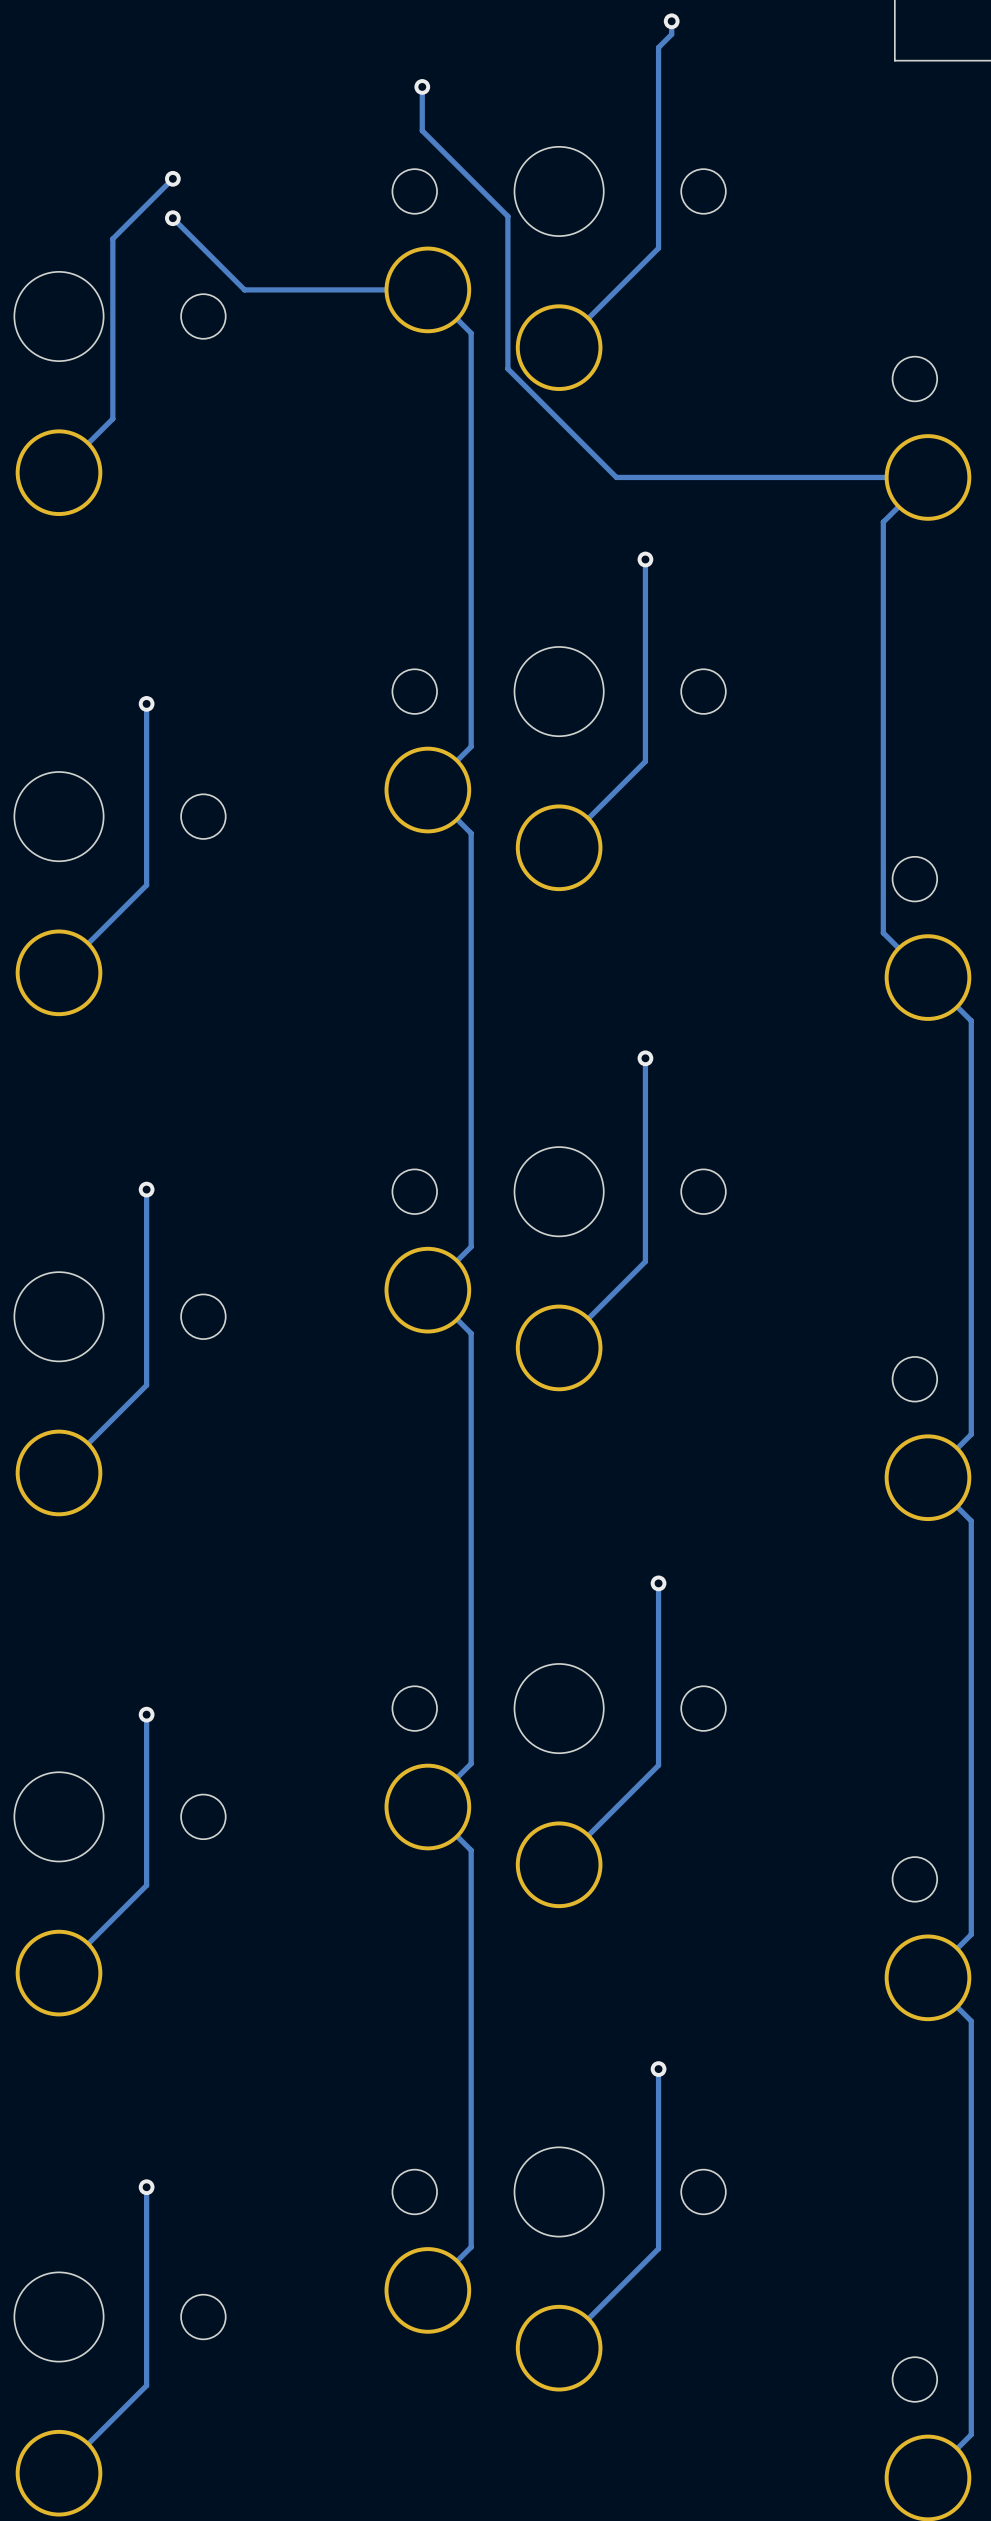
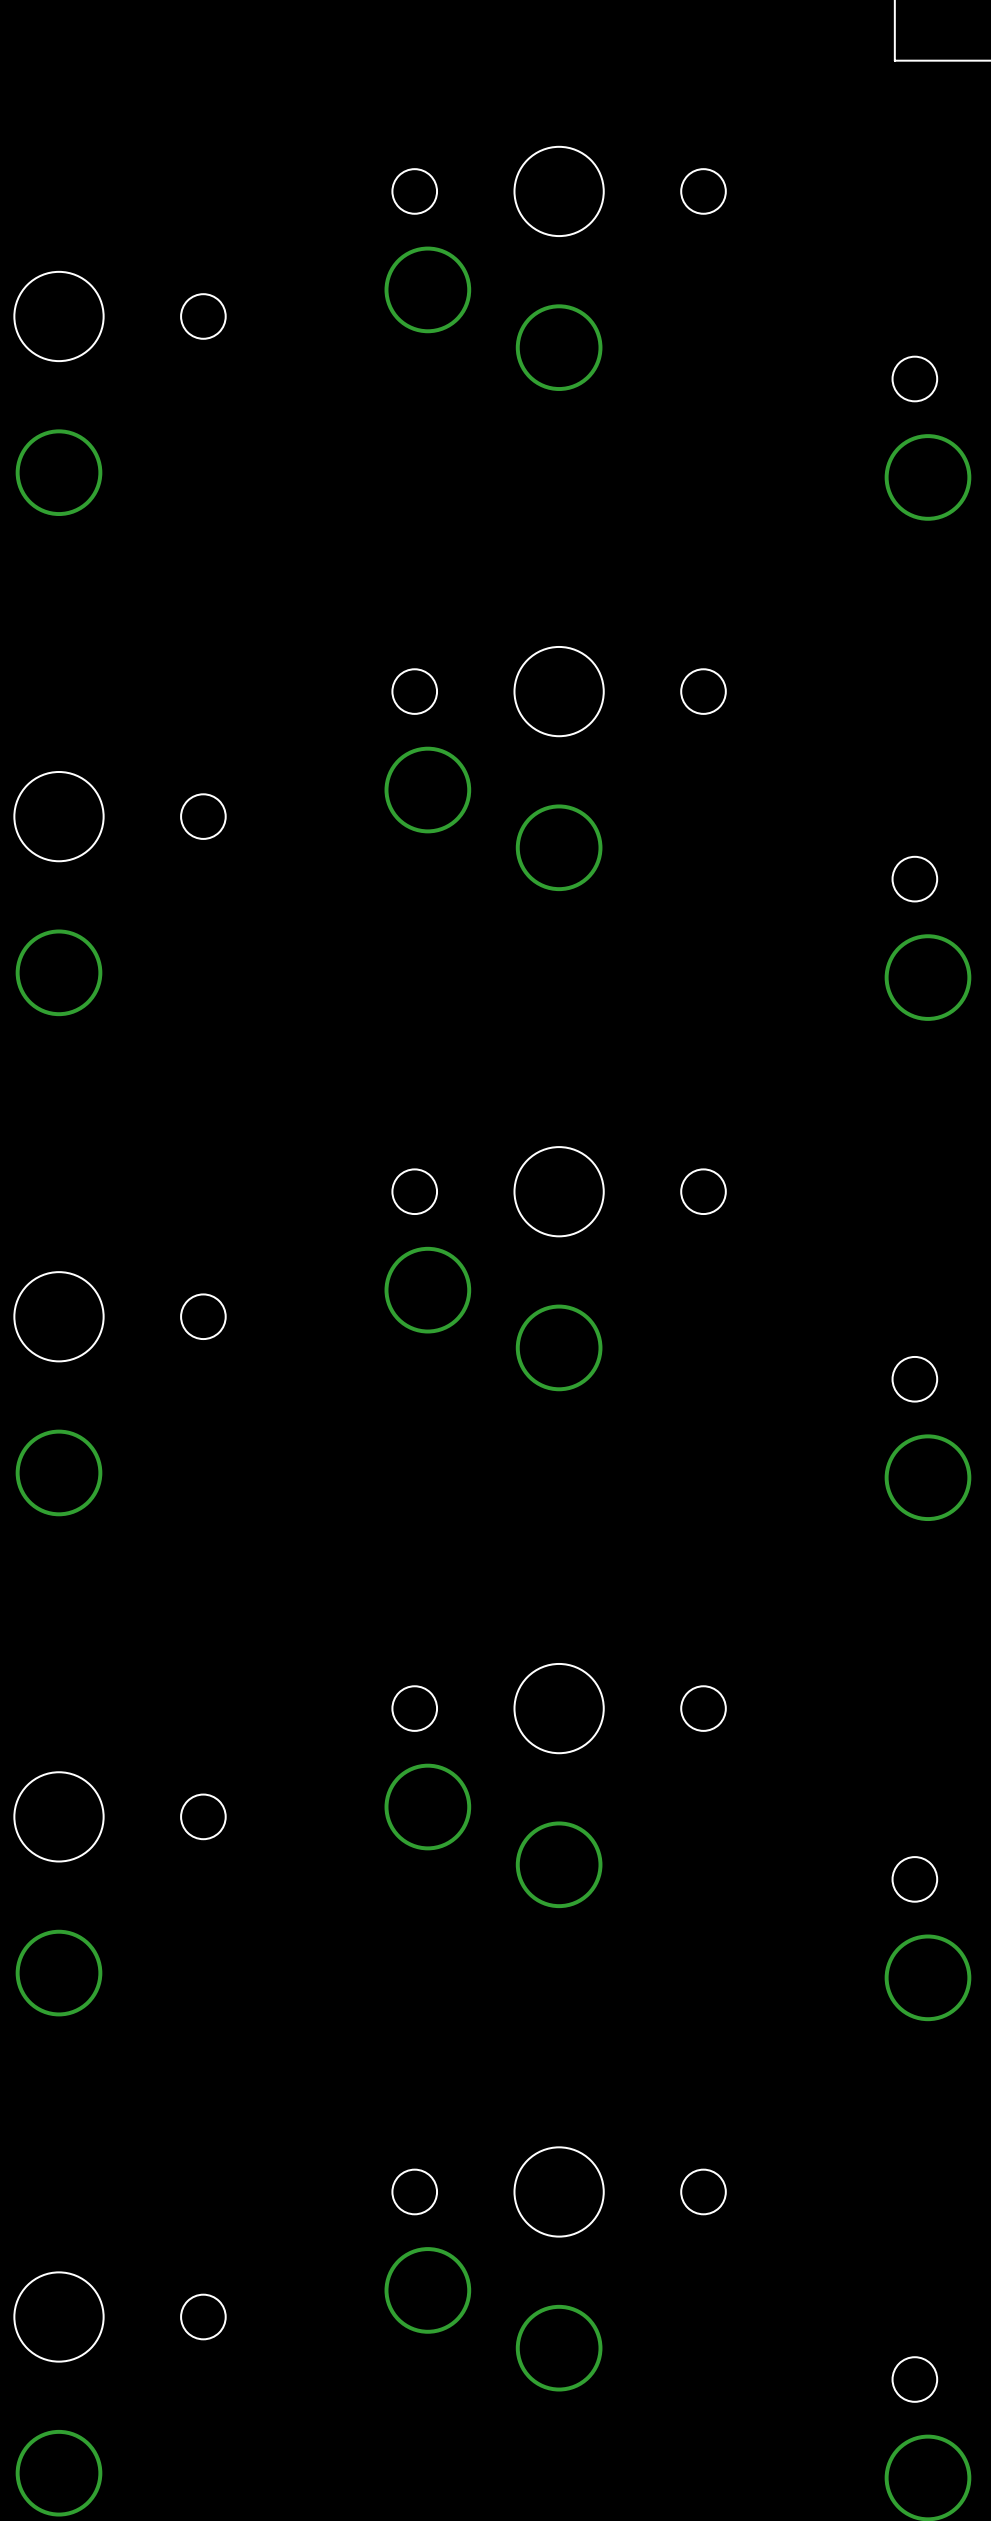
track: (671, 21) (671, 34) (658, 47) (658, 248) (559, 347) -> none
via: (671, 21) -> none
track: (422, 86) (422, 130) (507, 216) (507, 368) (616, 477) (927, 477) (883, 522) (883, 932) (971, 1020) (971, 1434) (927, 1477) (971, 1521) (971, 1934) (927, 1977) (971, 2021) (971, 2434) (927, 2477) -> none
via: (422, 86) -> none
track: (172, 178) (112, 238) (112, 418) (58, 472) -> none
via: (172, 178) -> none
track: (172, 218) (244, 289) (427, 289) (471, 333) (471, 746) (427, 790) (471, 833) (471, 1246) (427, 1290) (471, 1333) (471, 1763) (427, 1807) (471, 1850) (471, 2247) (427, 2290) -> none
via: (172, 218) -> none
track: (645, 559) (645, 761) (559, 847) -> none
via: (645, 559) -> none
track: (146, 703) (146, 885) (58, 972) -> none
via: (146, 703) -> none
track: (645, 1058) (645, 1261) (559, 1347) -> none
via: (645, 1058) -> none
track: (146, 1189) (146, 1385) (58, 1472) -> none
via: (146, 1189) -> none
track: (658, 1583) (658, 1765) (559, 1864) -> none
via: (658, 1583) -> none
track: (146, 1714) (146, 1885) (58, 1973) -> none
via: (146, 1714) -> none
track: (658, 2069) (658, 2248) (559, 2348) -> none
via: (658, 2069) -> none
track: (146, 2187) (146, 2385) (58, 2473) -> none
via: (146, 2187) -> none

